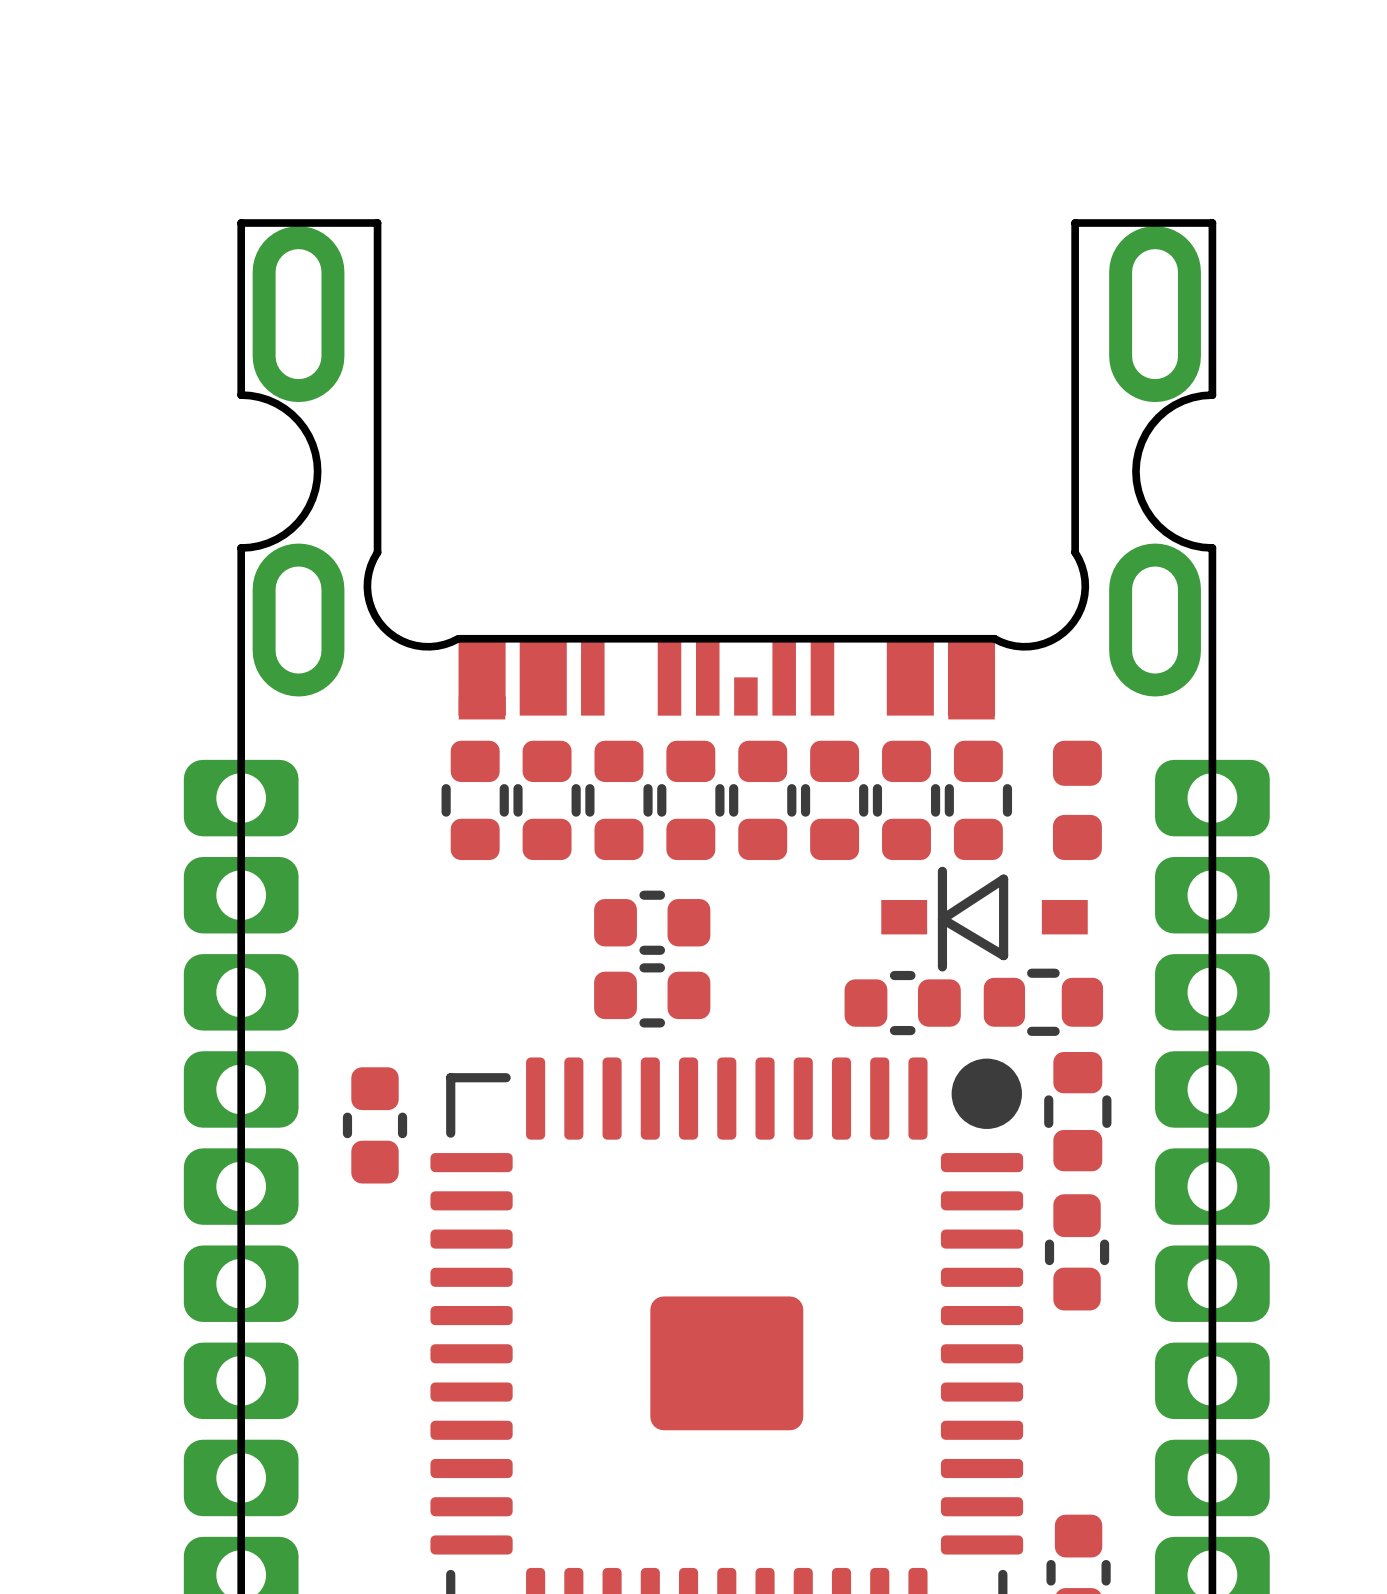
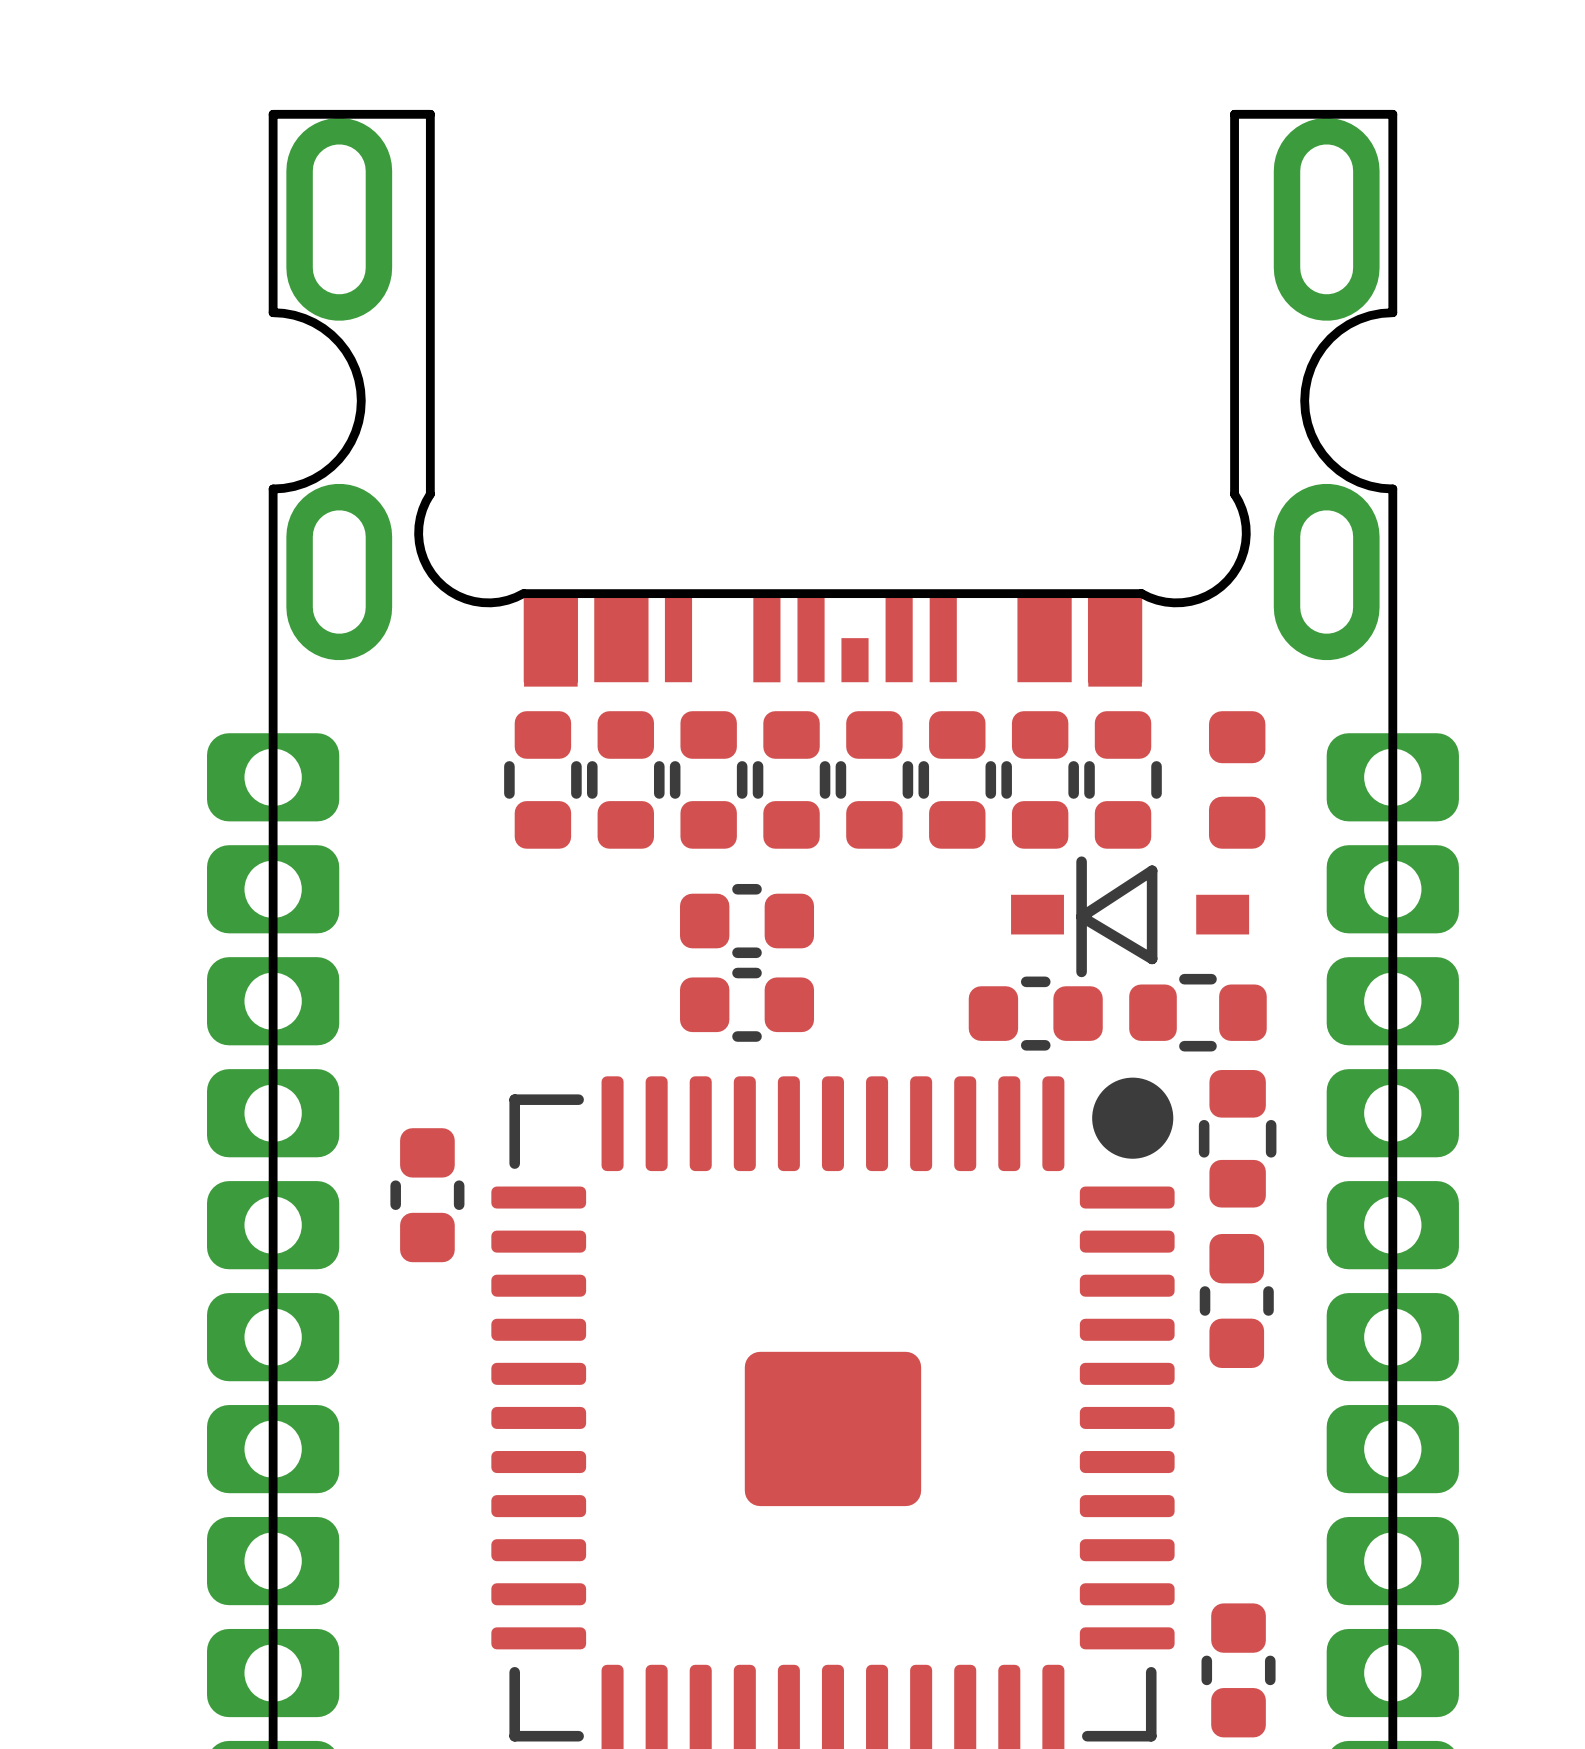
part position: (375, 1125) -> (427, 1195)

